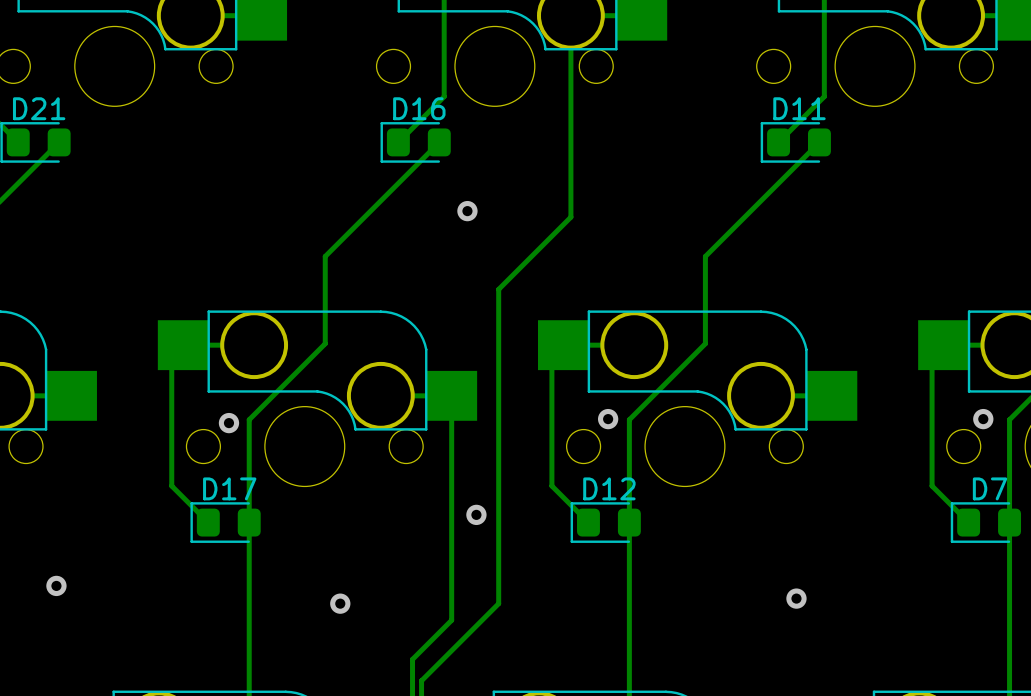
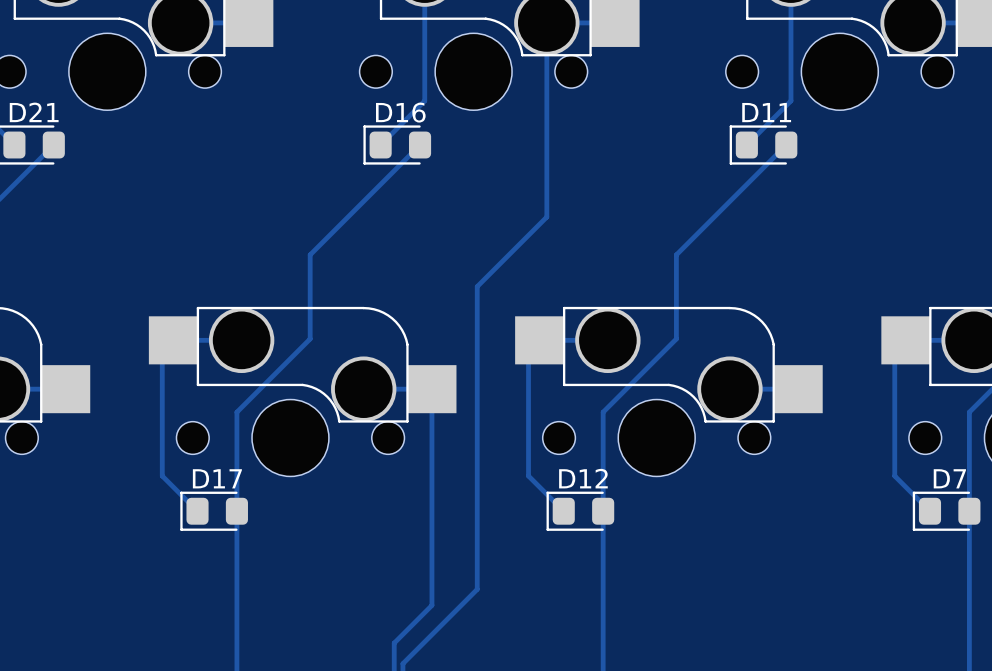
via: (467, 211) -> none
via: (608, 419) -> none
via: (983, 419) -> none
via: (228, 423) -> none
via: (476, 514) -> none
via: (56, 585) -> none
via: (796, 598) -> none
via: (340, 603) -> none

